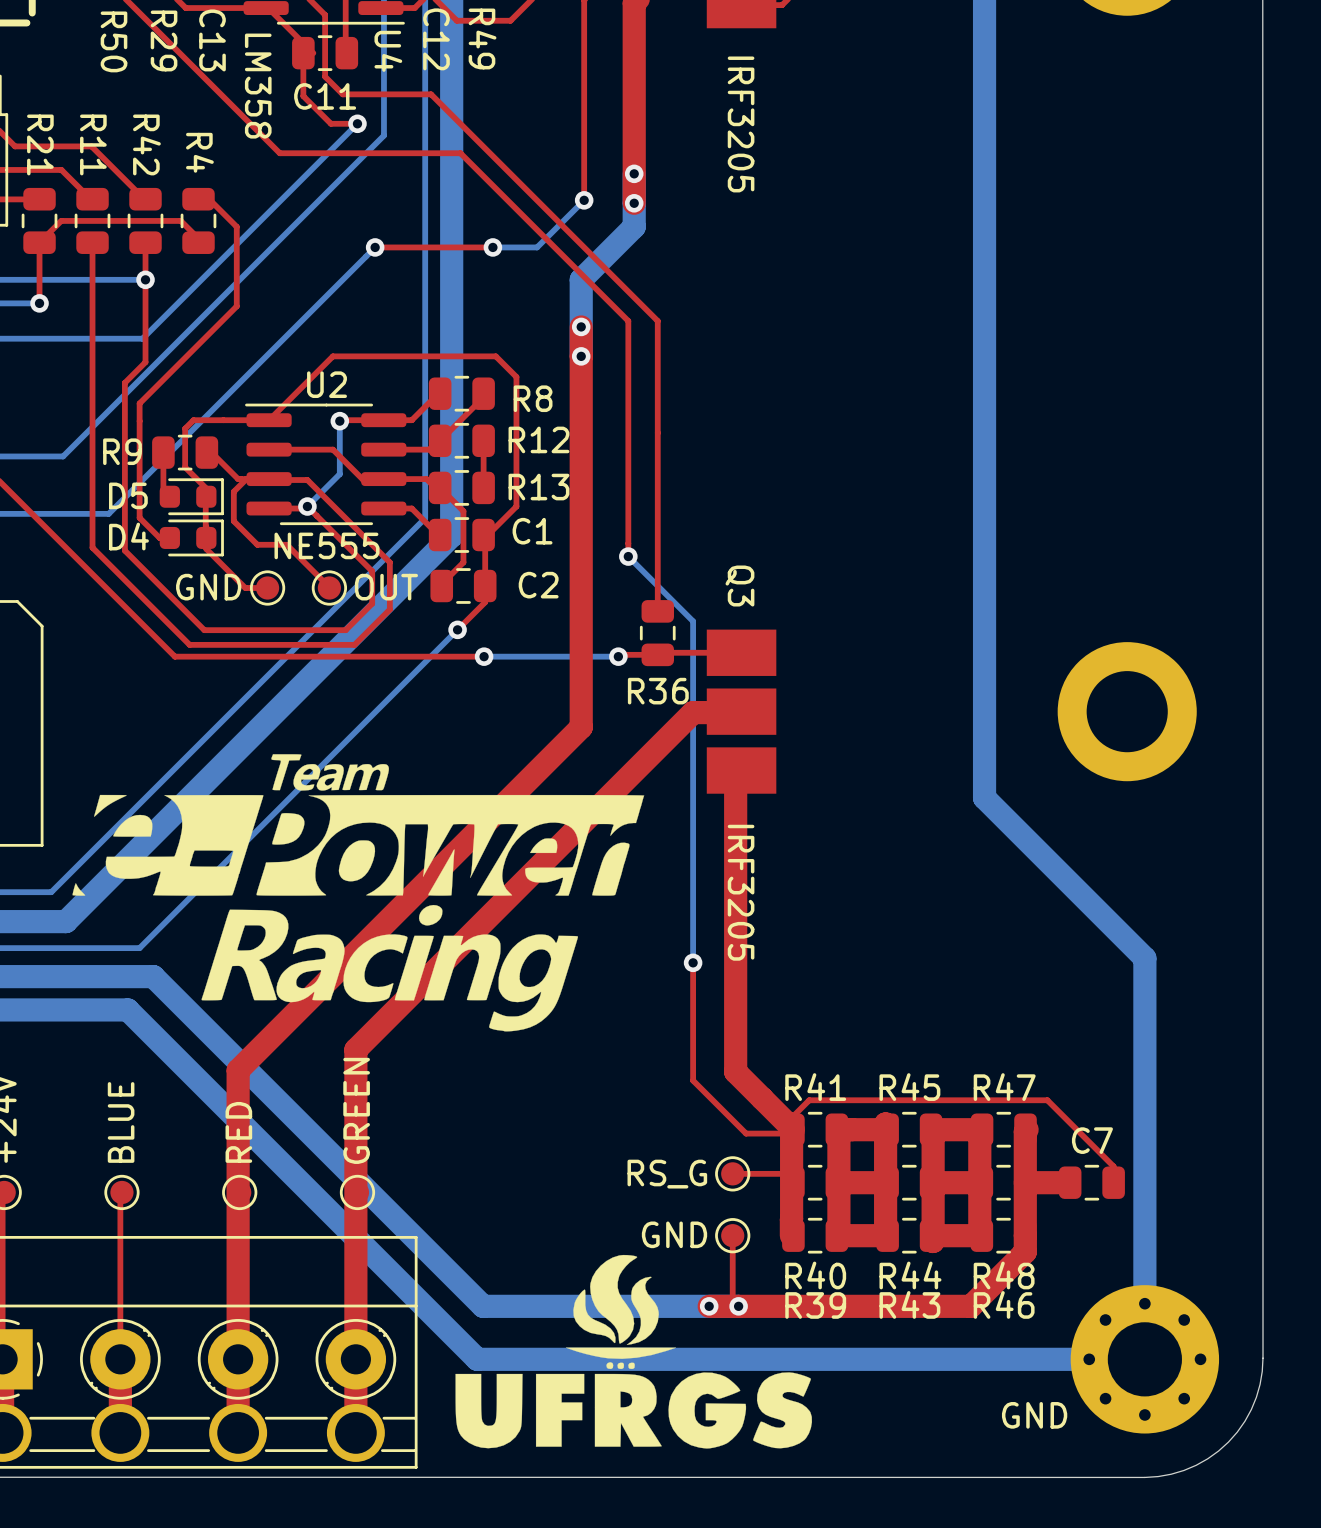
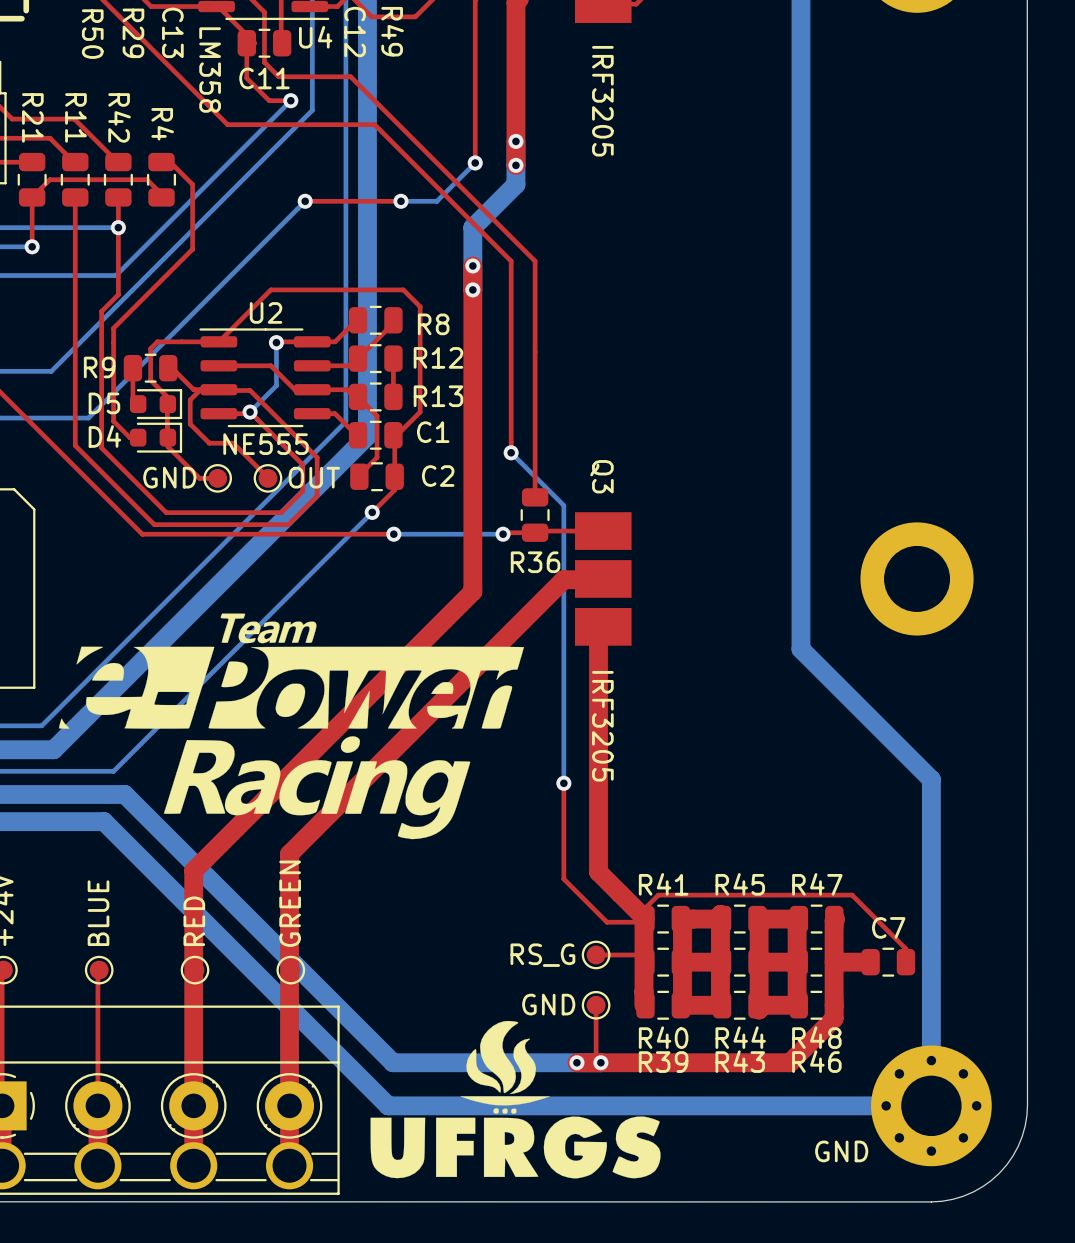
U4 name rotation: 0° (388, 51) -> 90° counterclockwise (315, 37)

